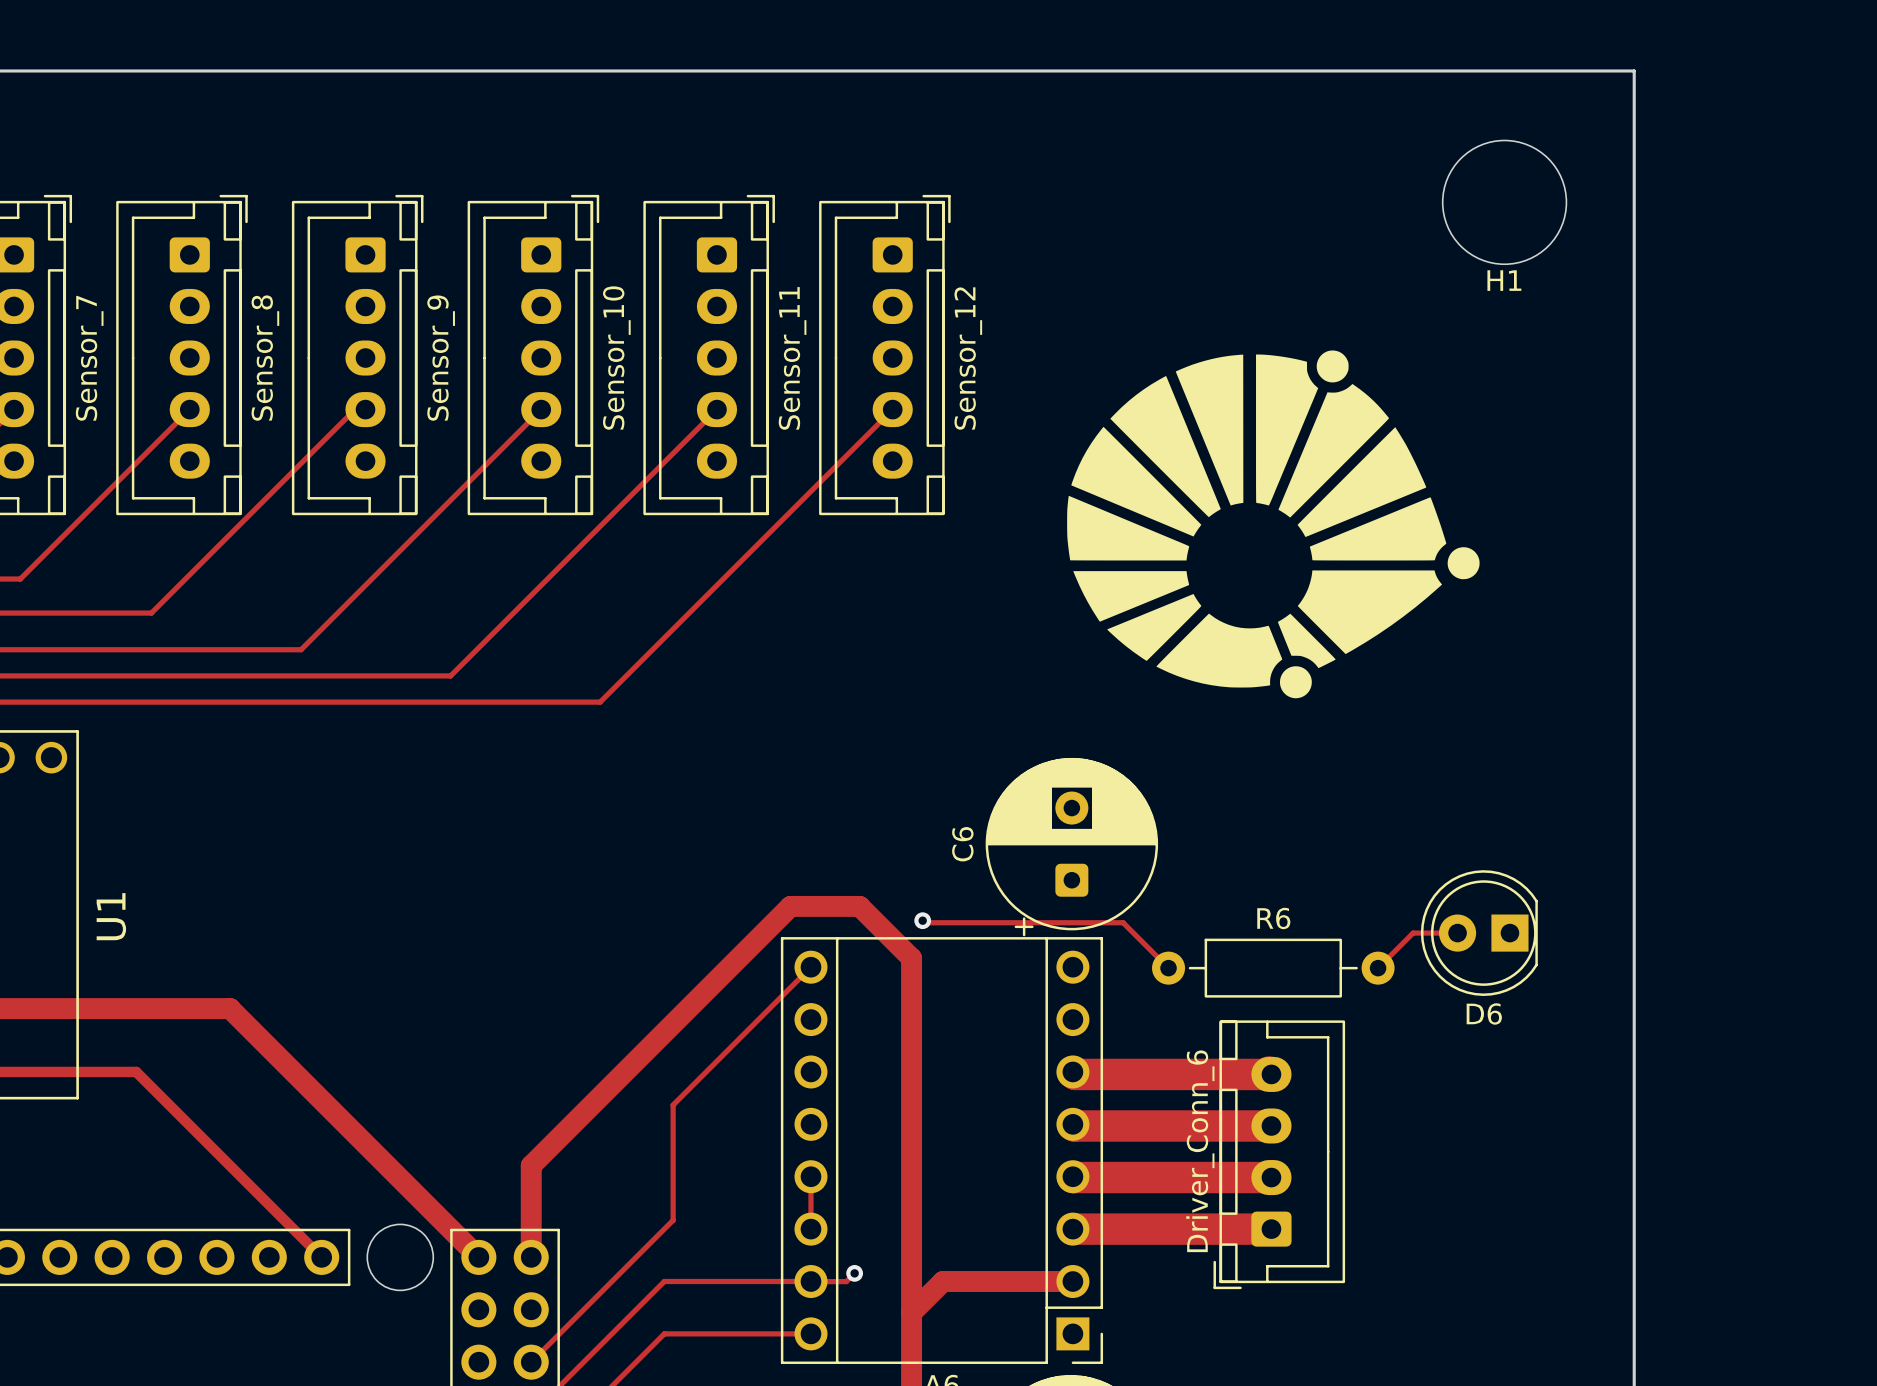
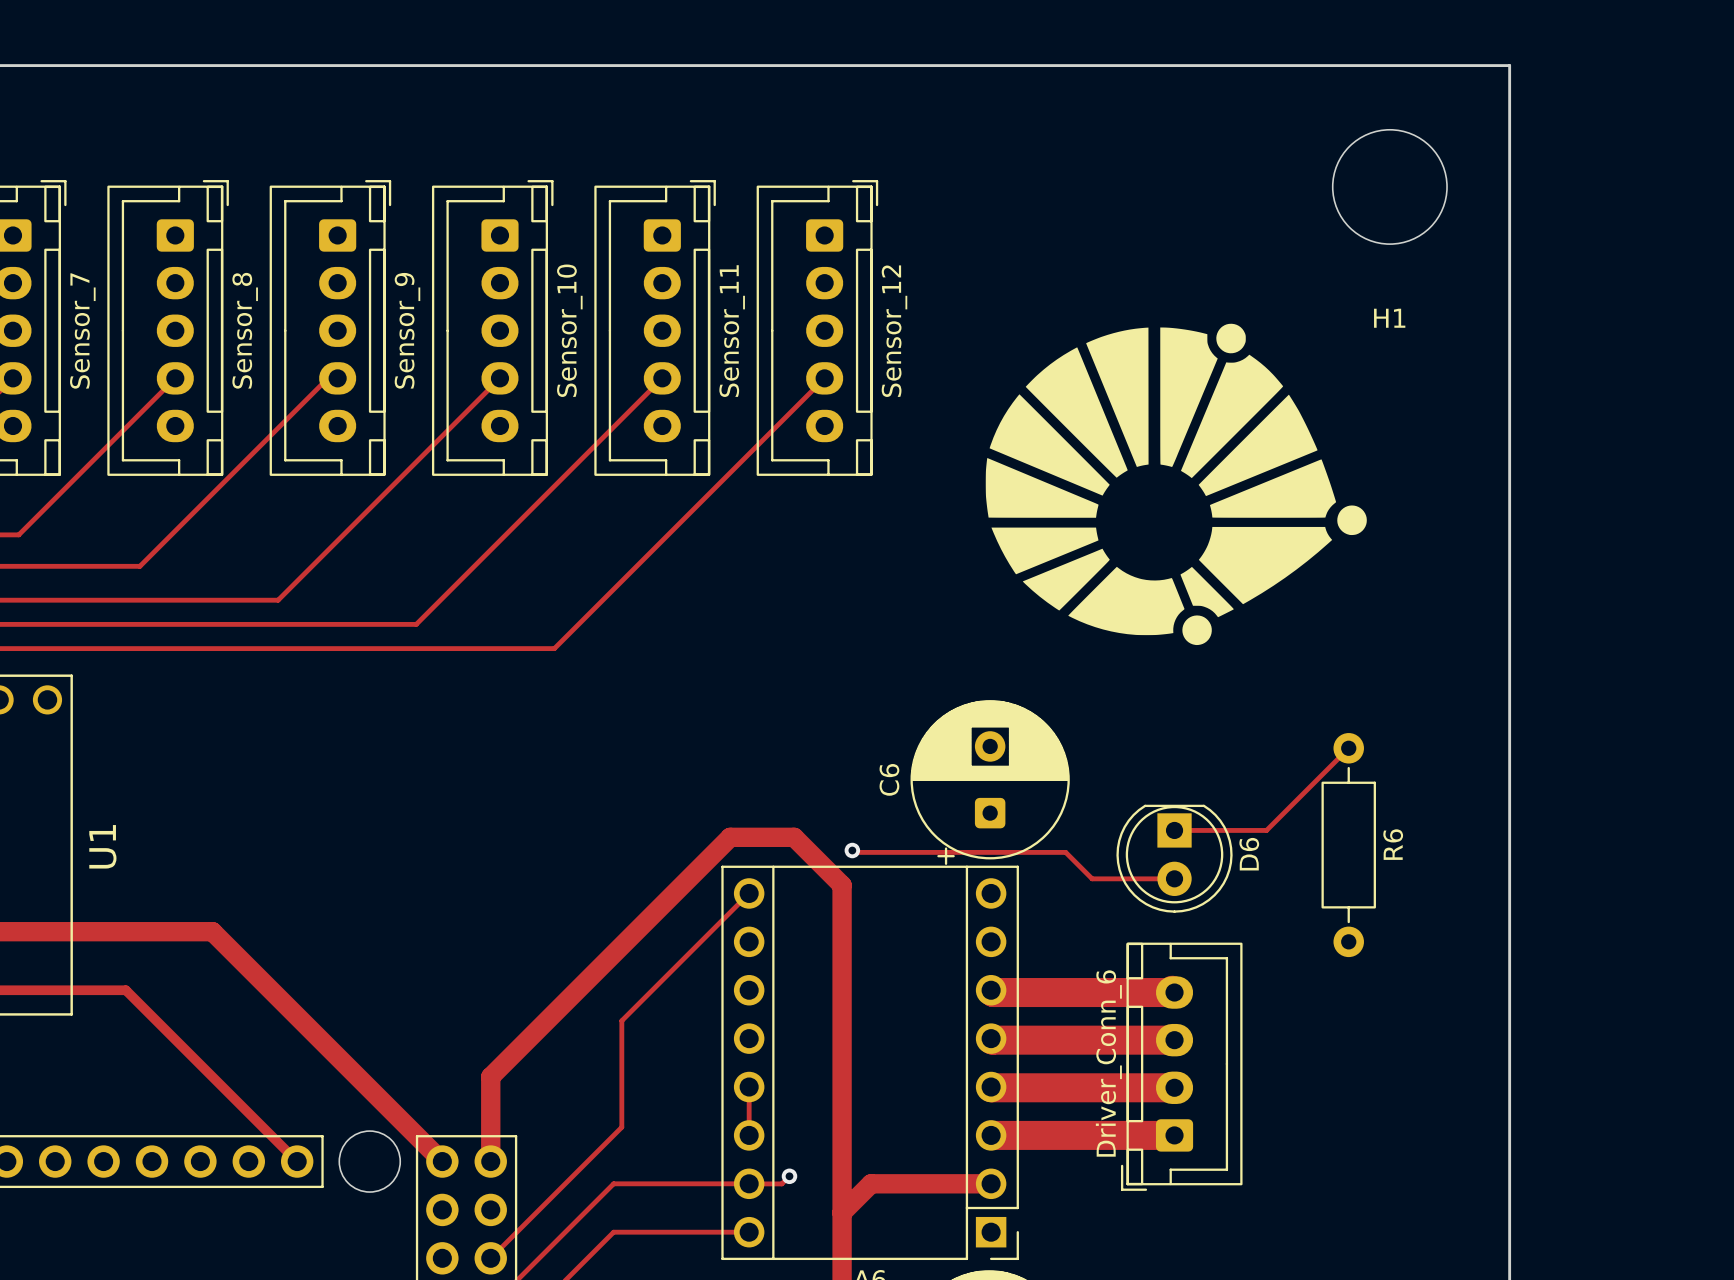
H1 name position: H1 (1504, 280) -> H1 (1389, 318)
track: none -> (1348, 748) (1266, 830) (1174, 830)
track: (1123, 922) (1168, 968) -> (1037, 852) (1065, 852) (1092, 878) (1174, 878)
track: (1457, 933) (1413, 933) (1378, 968) -> none
D6 rotation: 0° (1479, 933) -> 90° counterclockwise (1174, 858)
D6 position: (1479, 933) -> (1174, 858)
R6 rotation: 0° (1273, 968) -> 90° clockwise (1348, 845)
R6 position: (1273, 968) -> (1348, 845)

